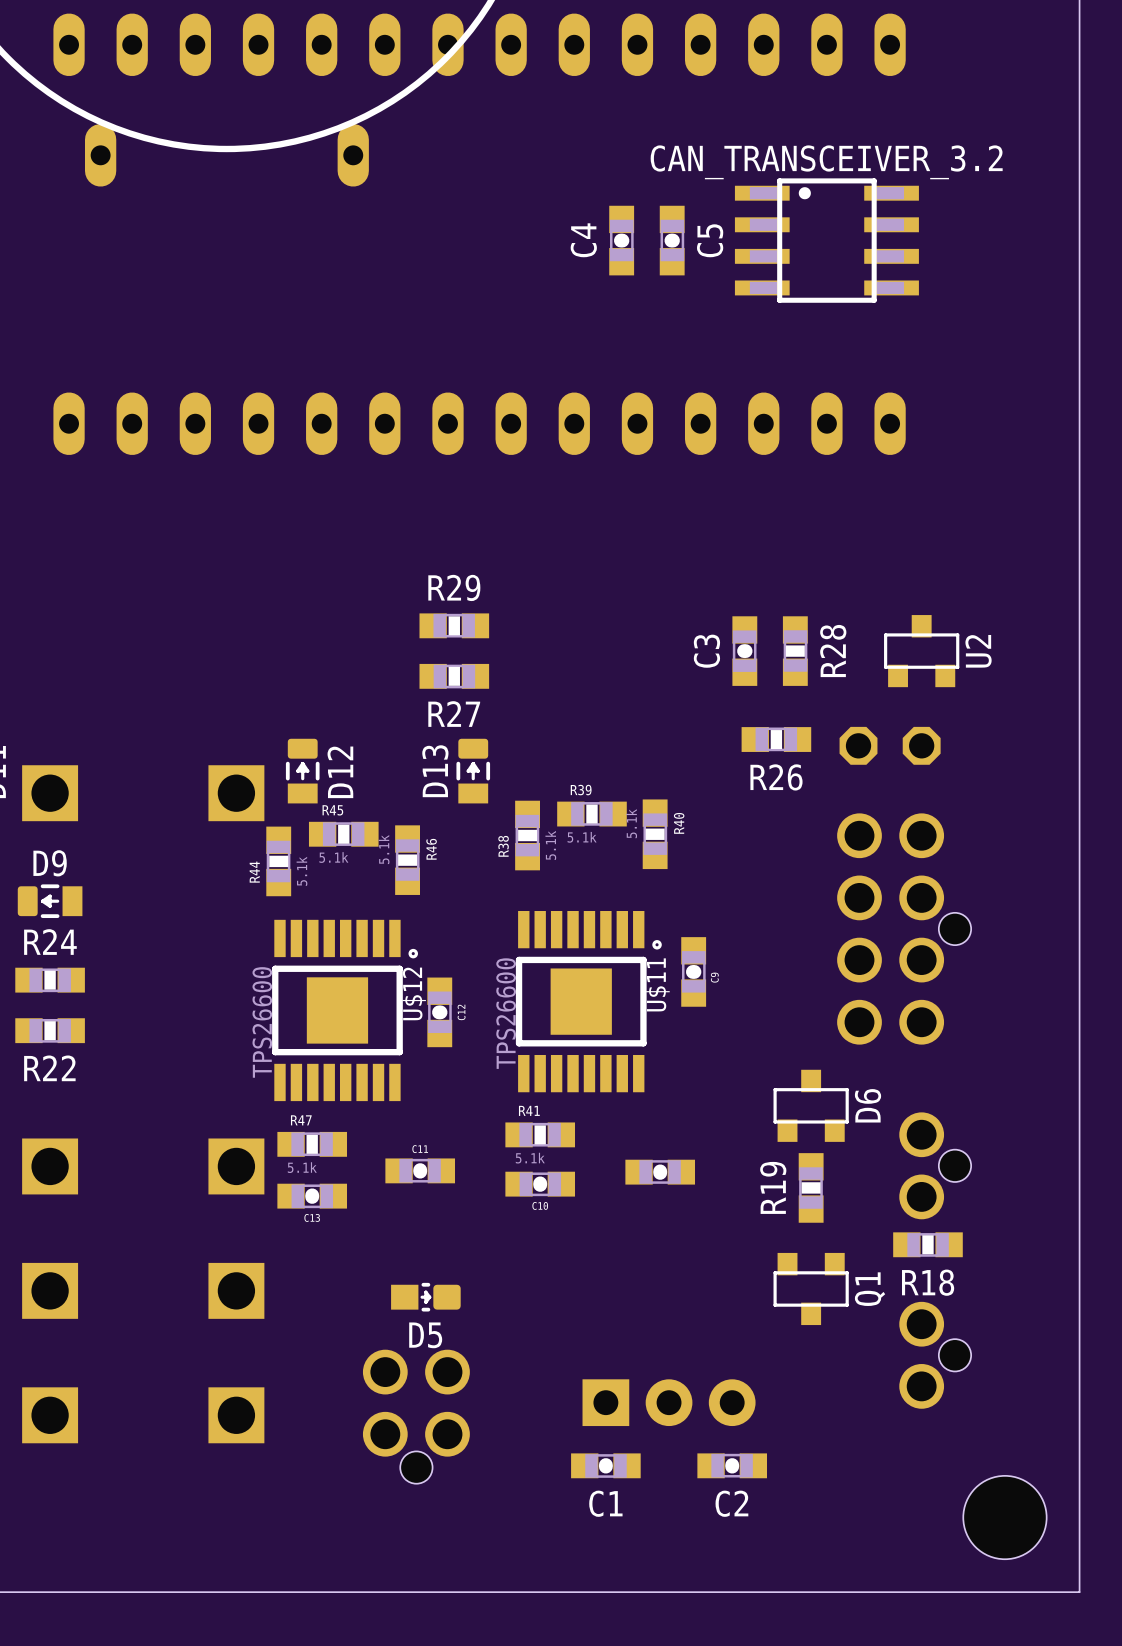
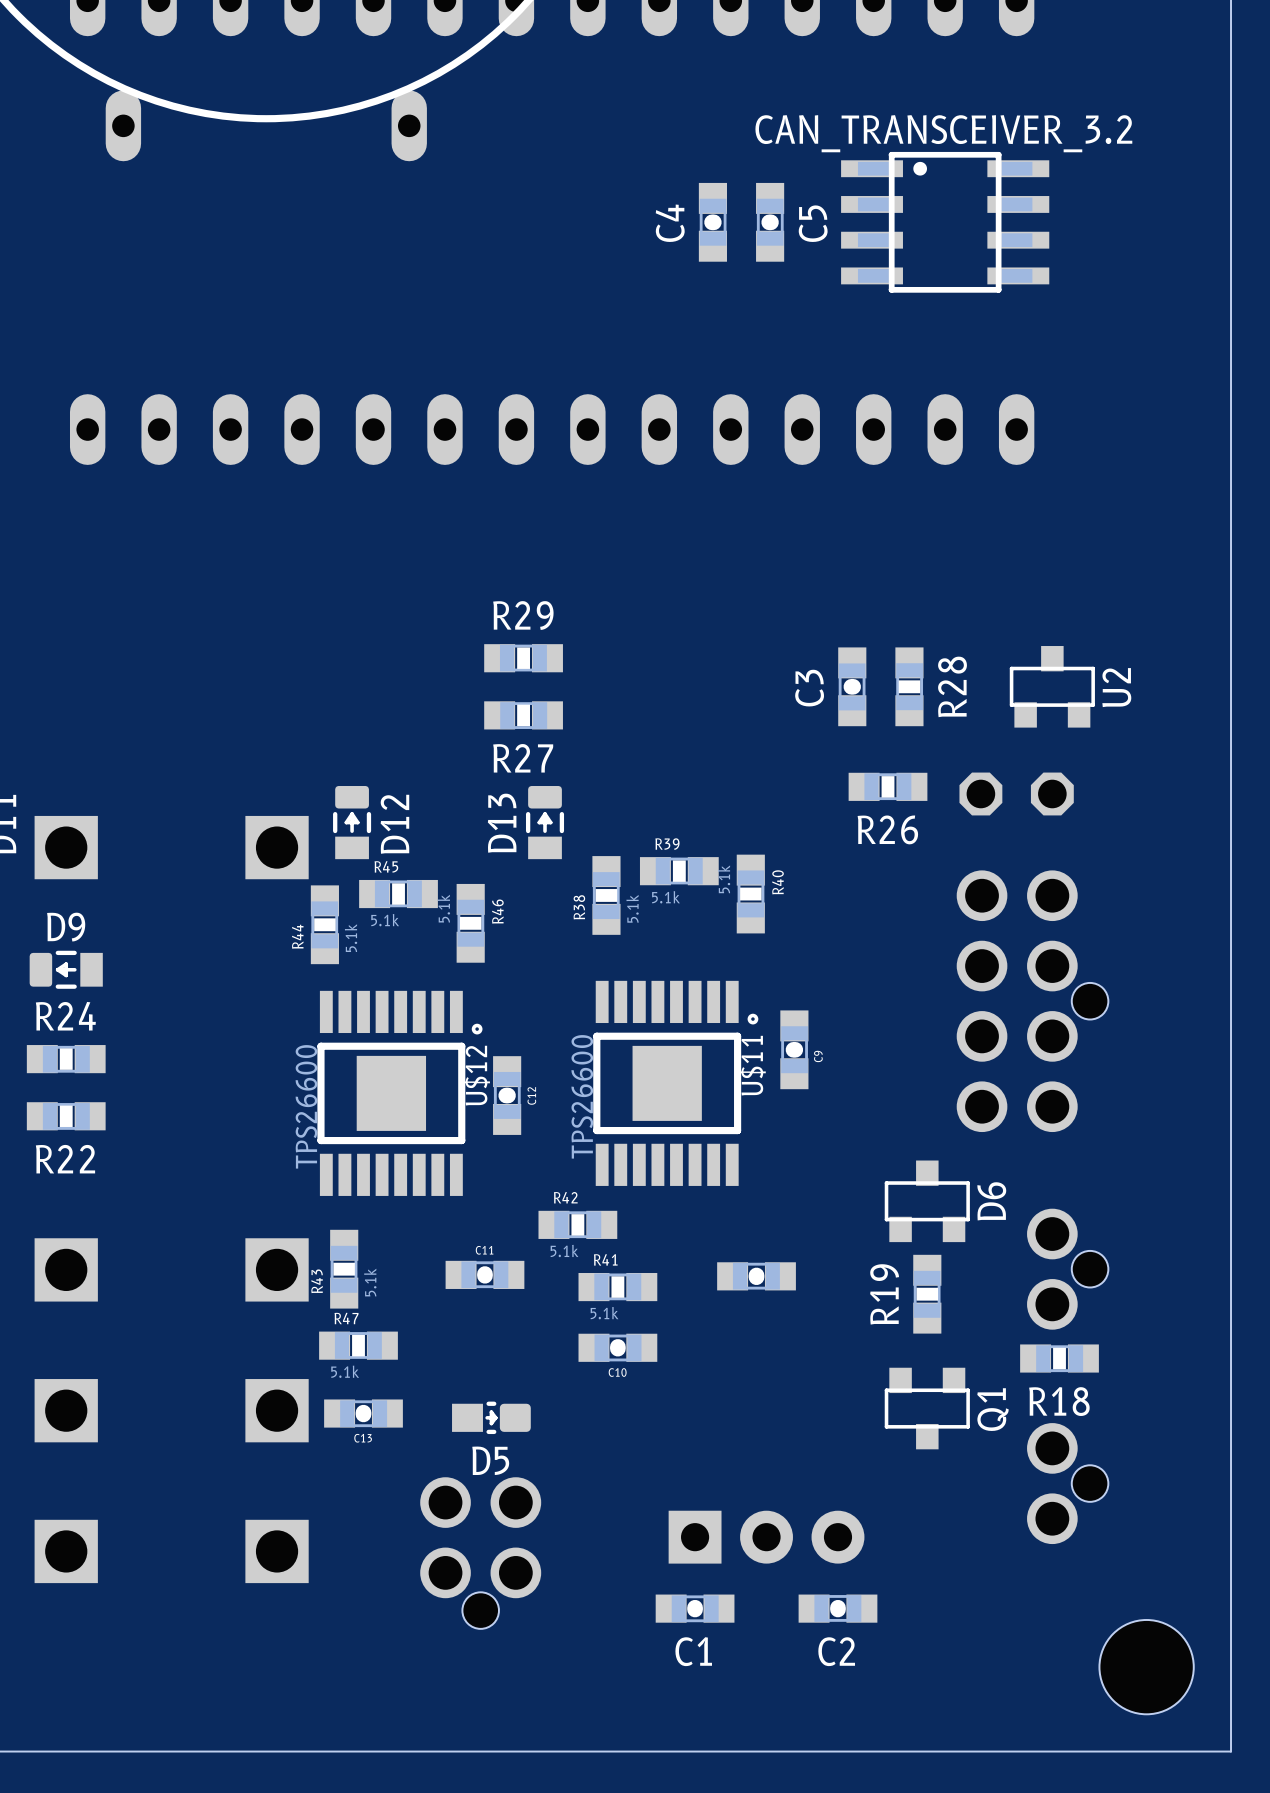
R42: none -> 5.1k (577, 1224)
R41 position: (540, 1134) -> (617, 1287)
R47 position: (312, 1144) -> (358, 1345)
R43: none -> 5.1k (344, 1269)
C10 position: (540, 1184) -> (617, 1347)
C13 position: (312, 1196) -> (363, 1413)

